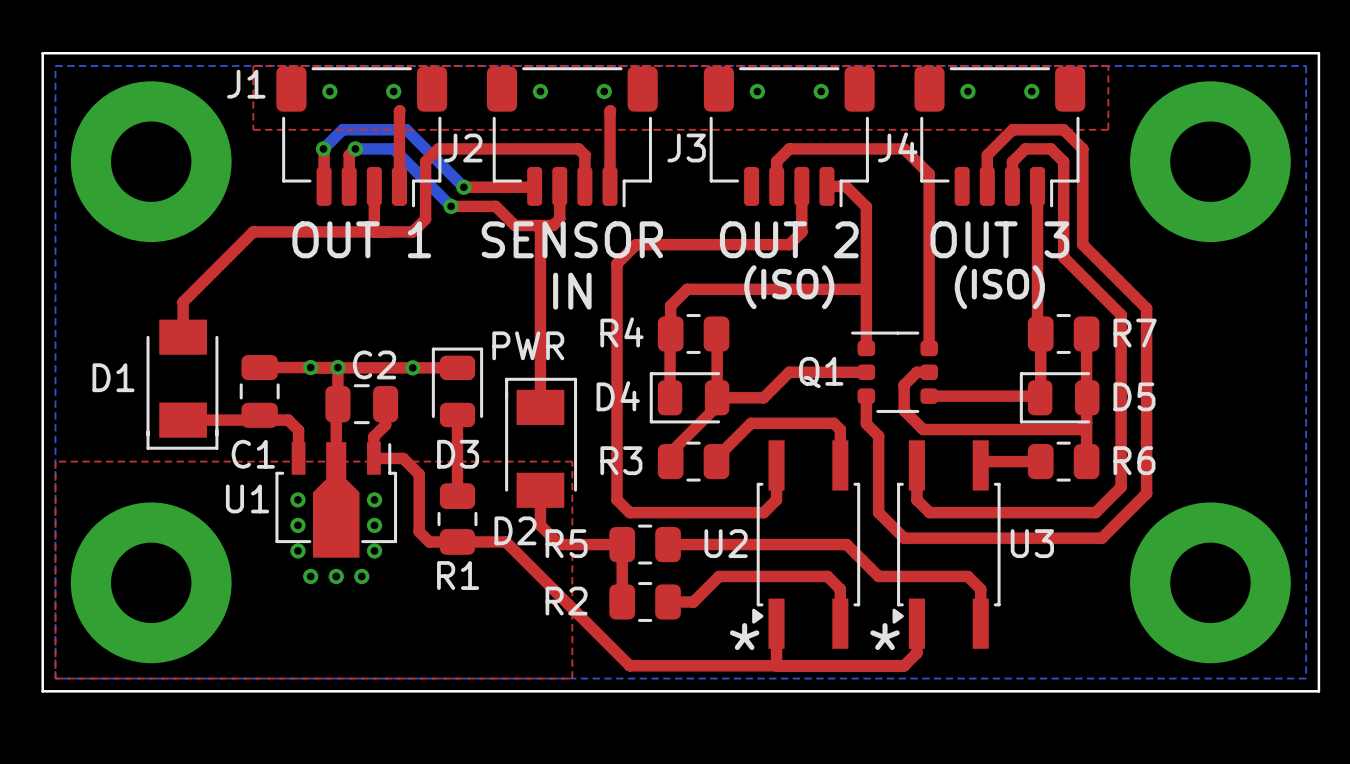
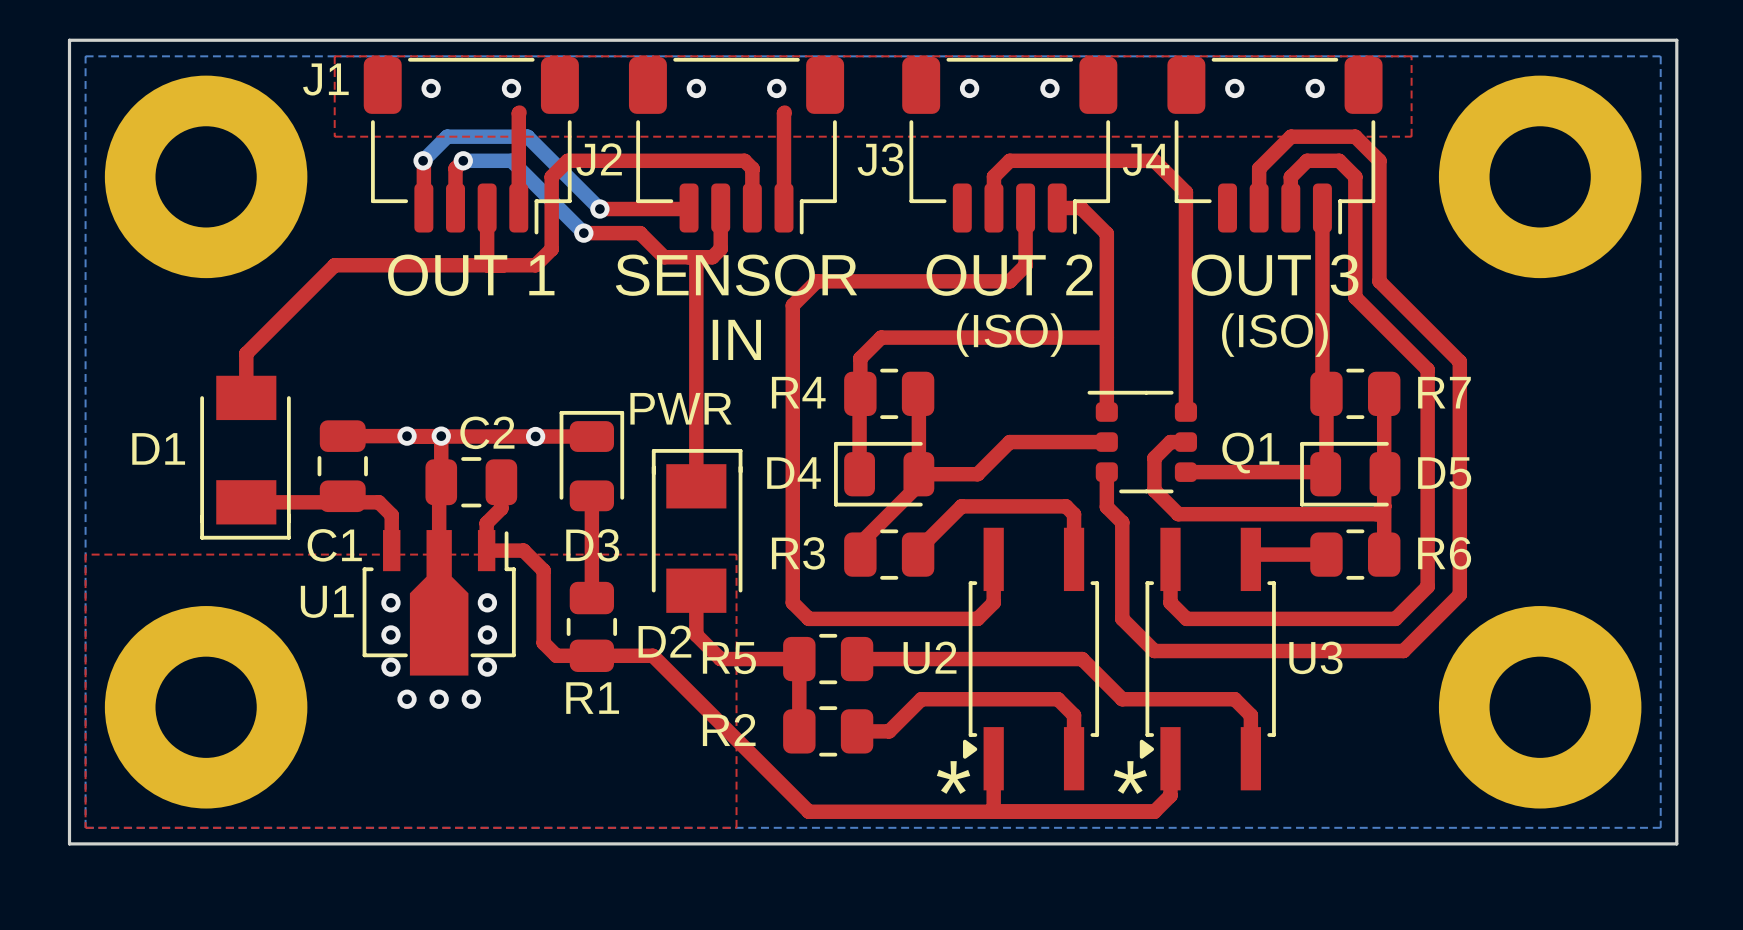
Q1 name position: Q1 (821, 372) -> Q1 (1250, 453)

